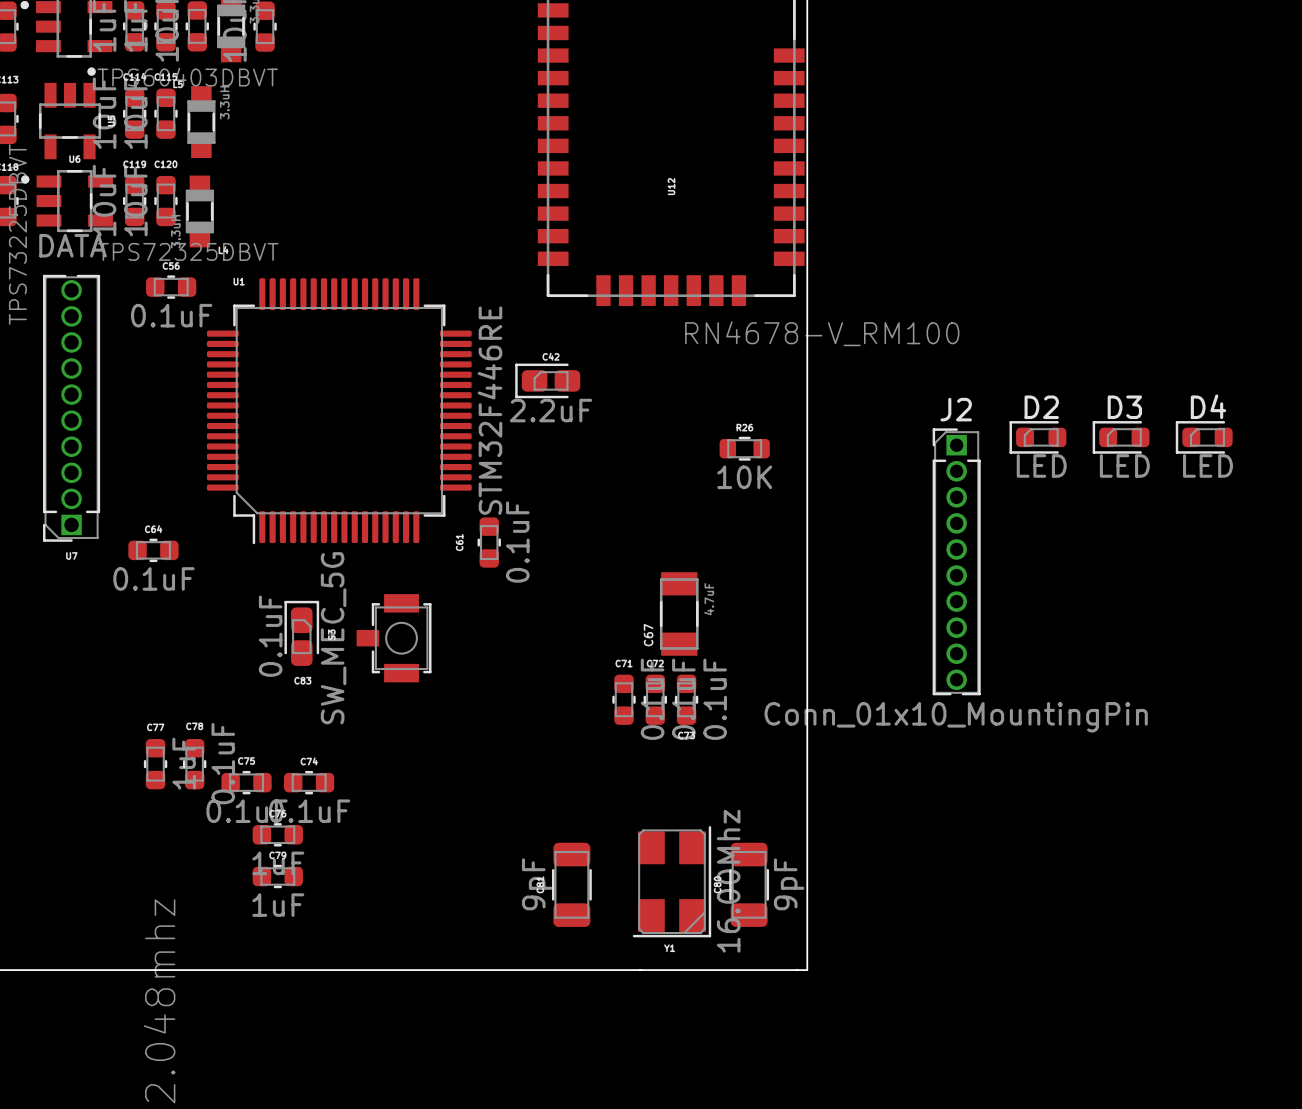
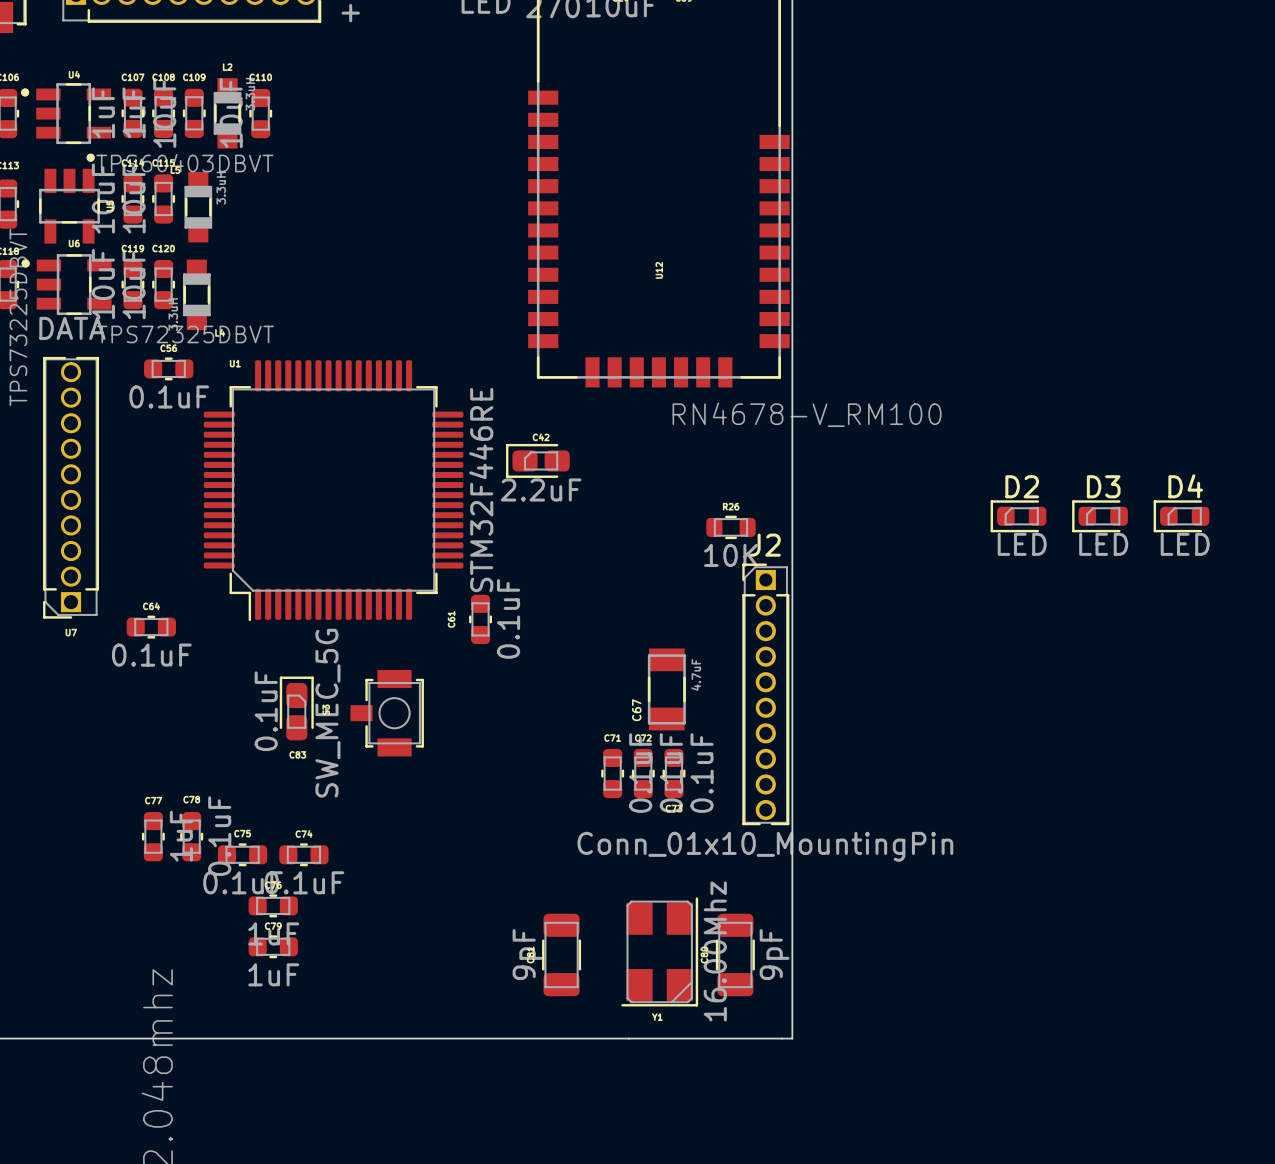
J2 position: (956, 561) -> (765, 694)

